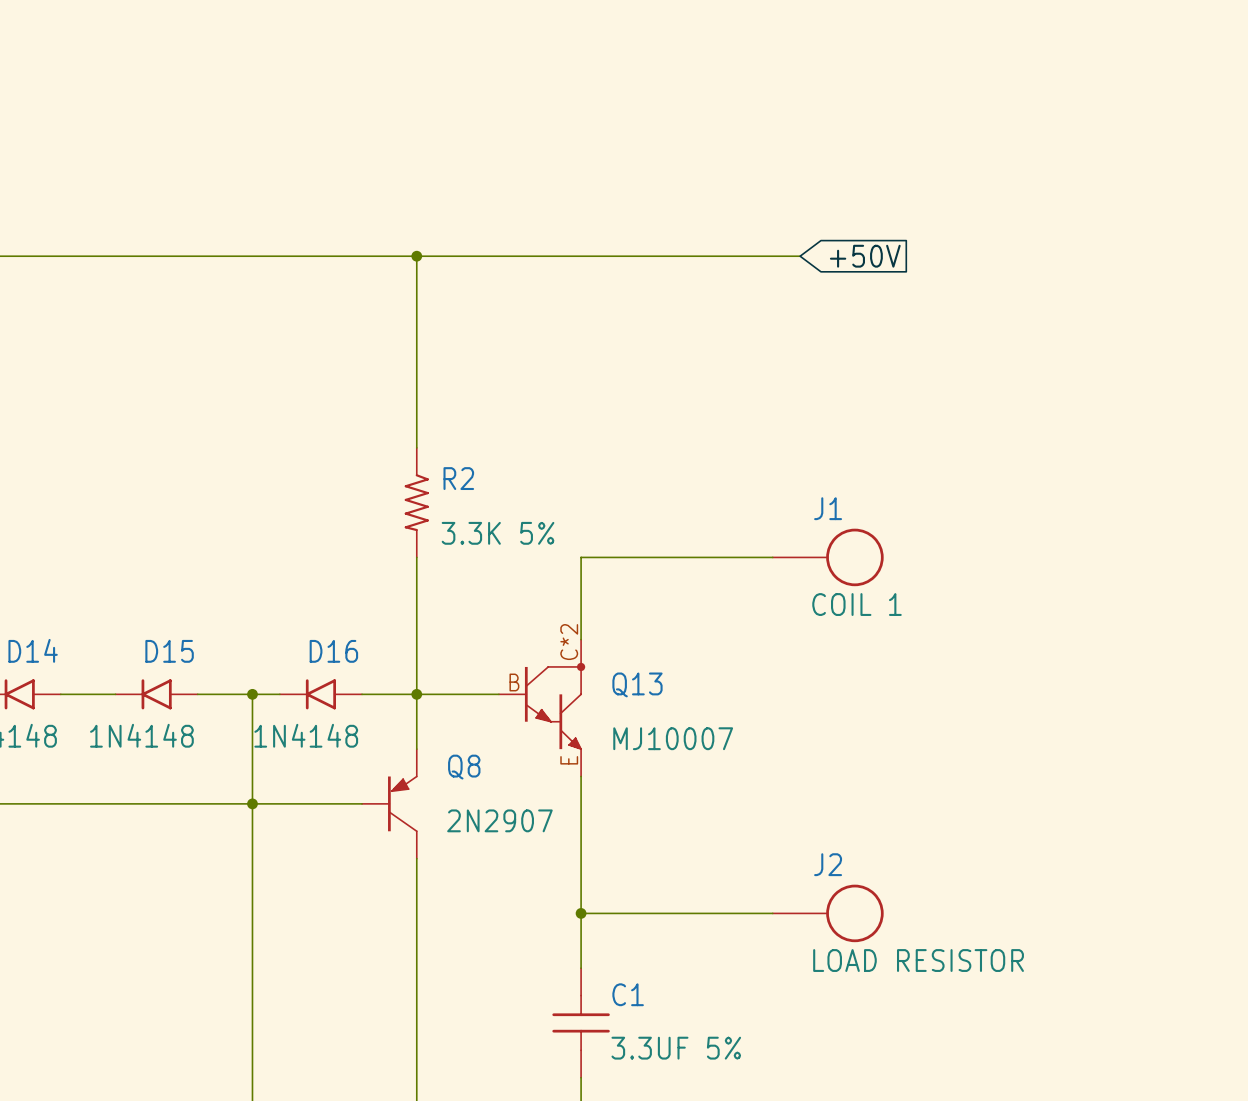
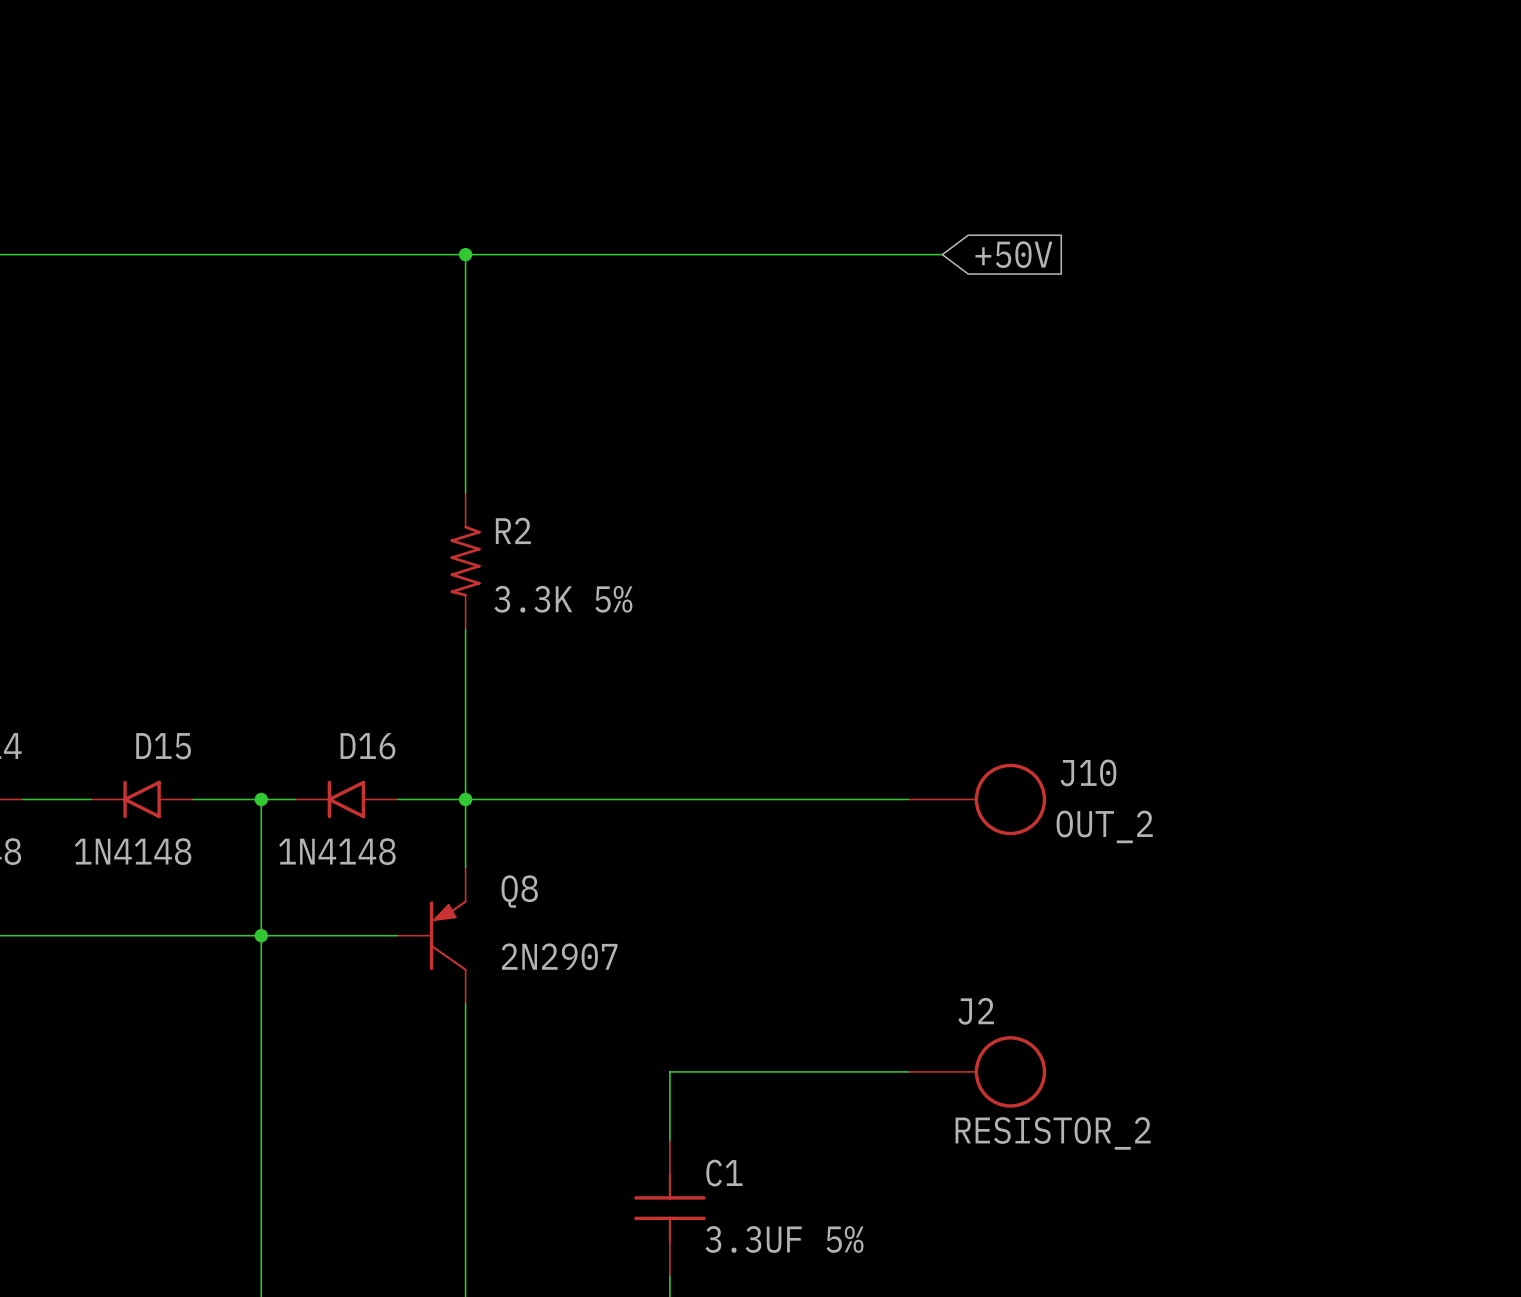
wire: (772, 557) (581, 557) (581, 639) -> none
J1: COIL 1 (828, 557) -> none
wire: none -> (567, 799) (908, 799)
J10: none -> OUT_2 (977, 799)
Q13: MJ10007 (542, 708) -> none
wire: (581, 776) (581, 913) -> none
junction: (581, 913) -> none
J2 value: LOAD RESISTOR (918, 960) -> RESISTOR_2 (1053, 1133)

